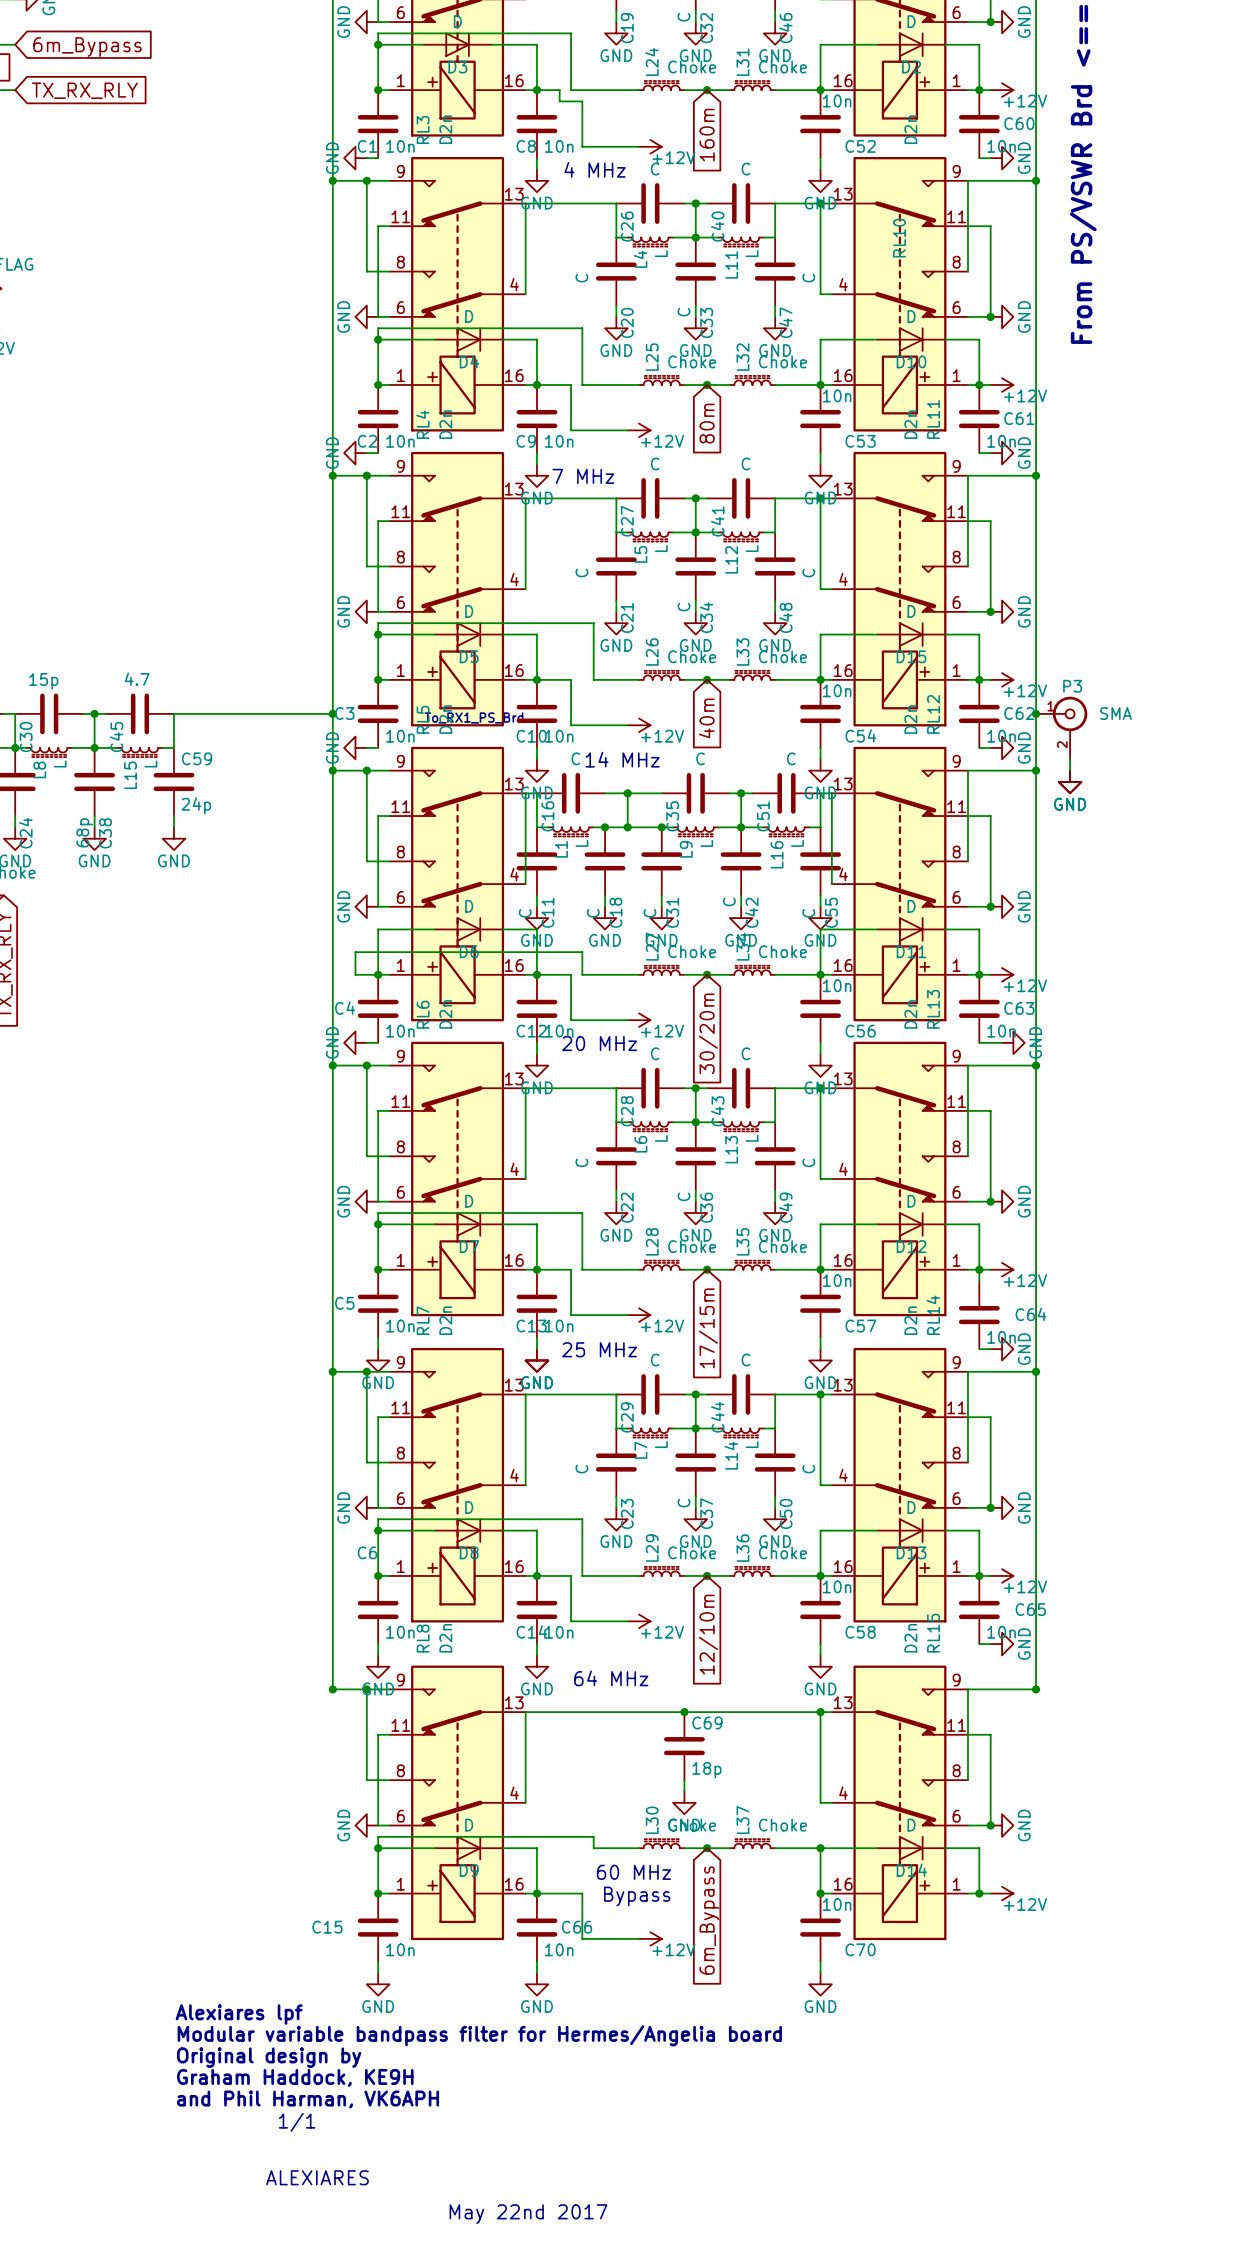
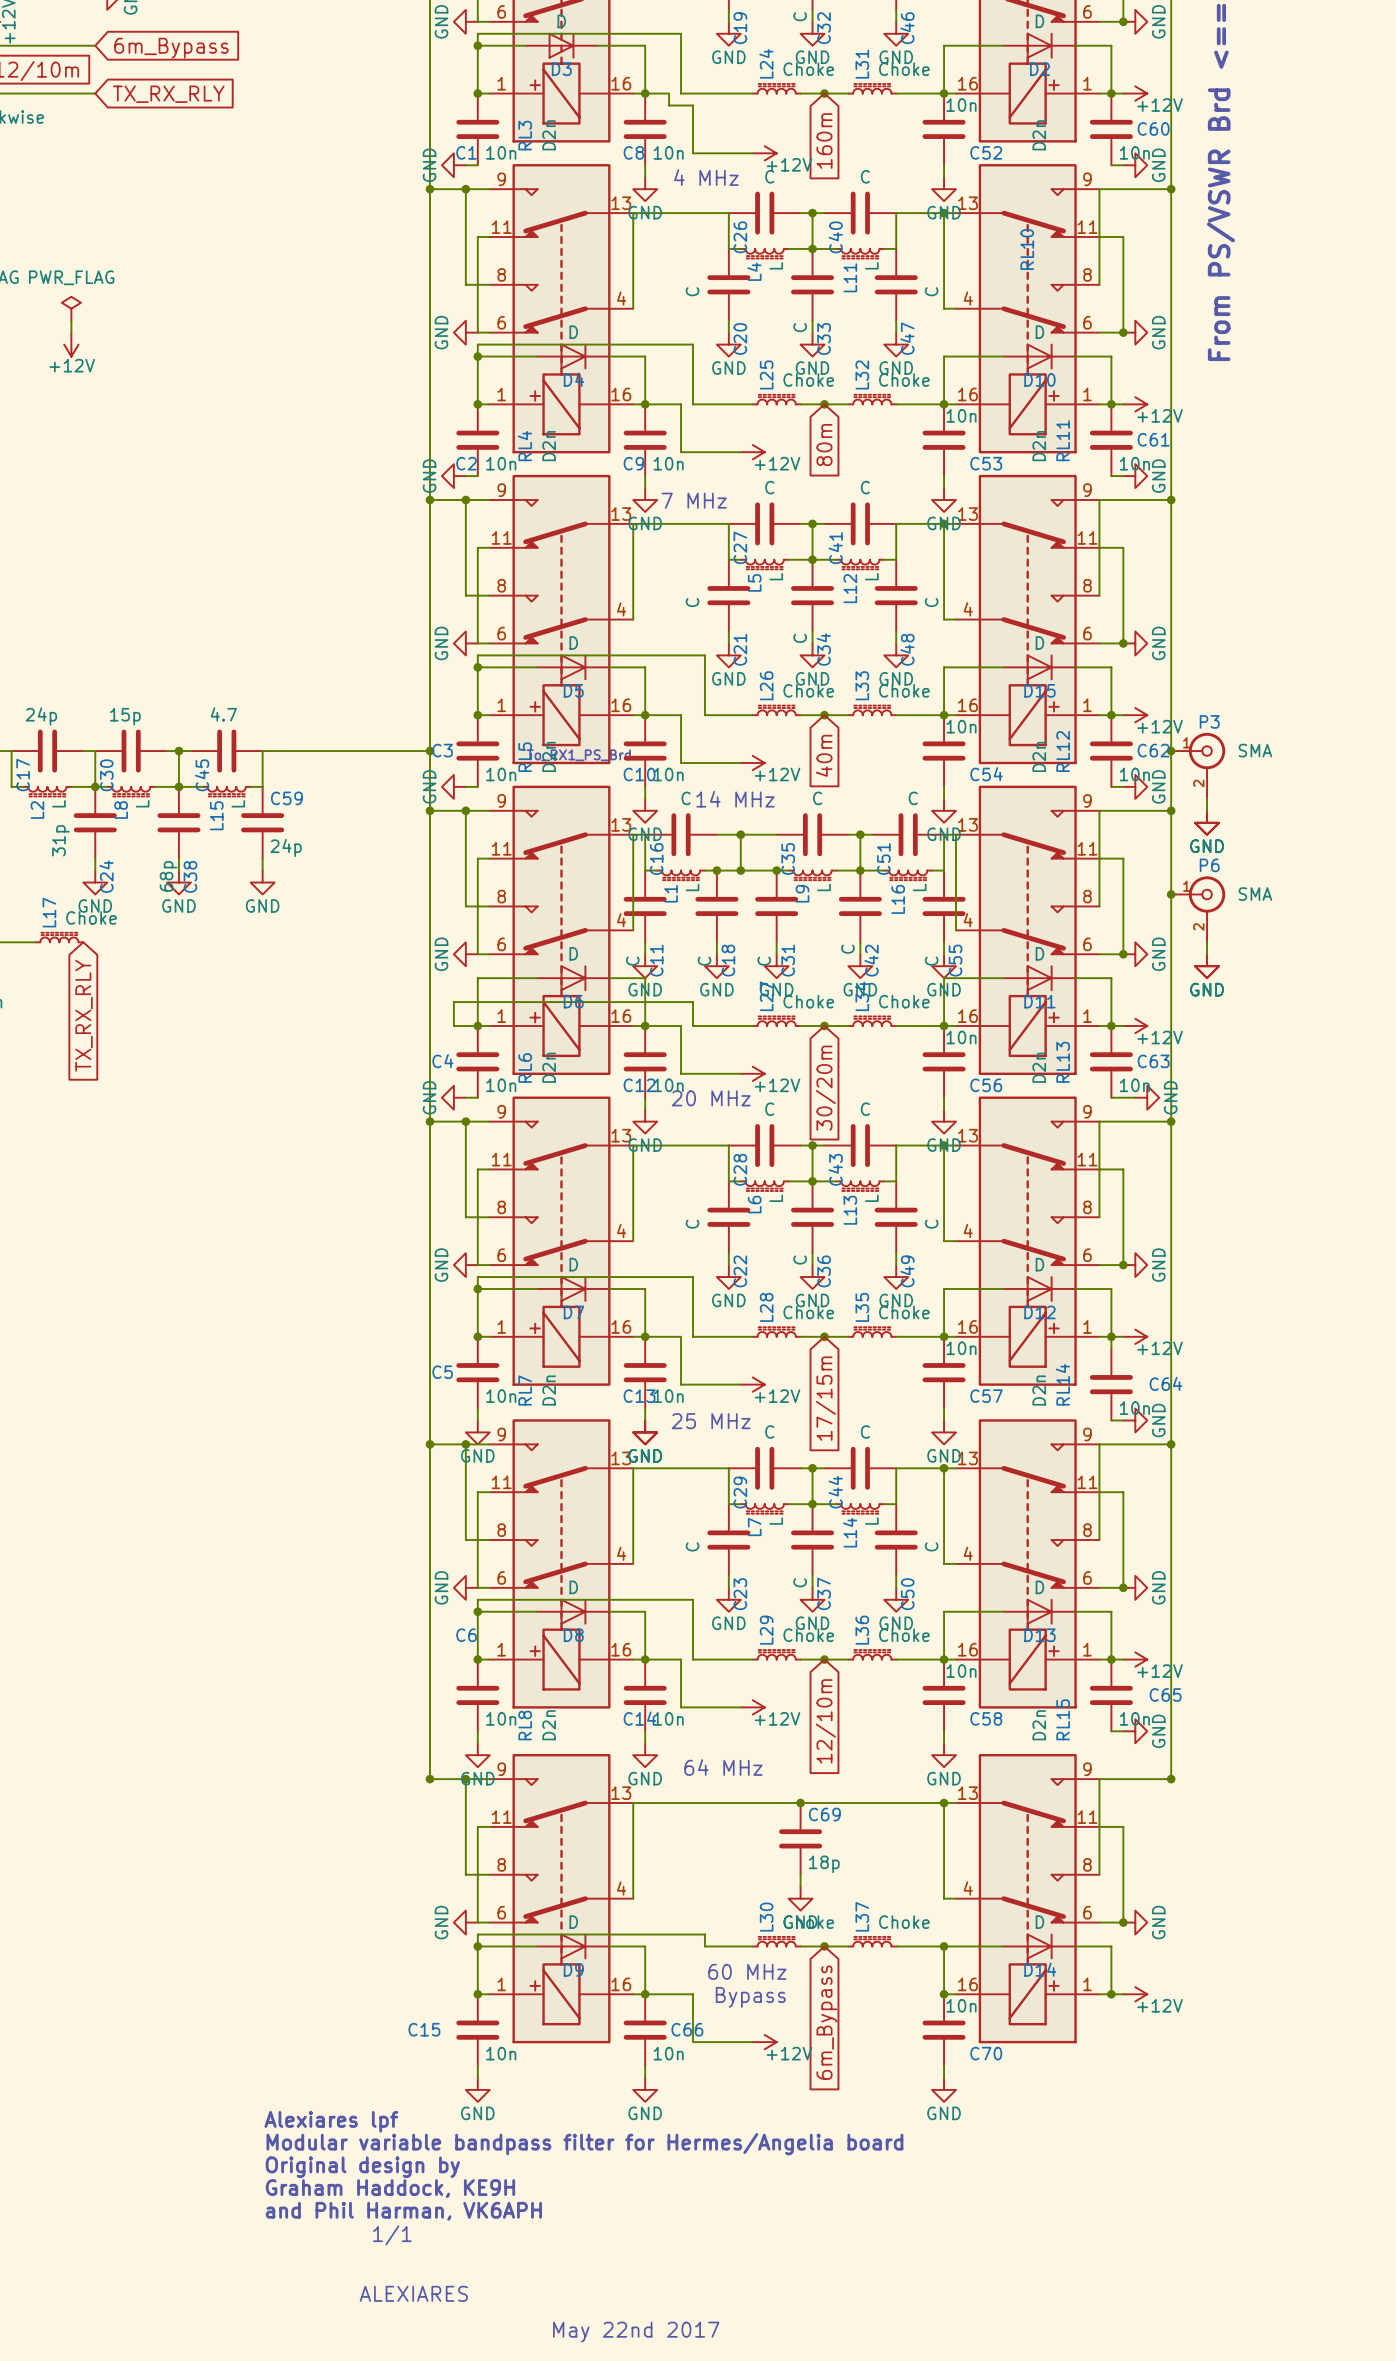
junction: none -> (1171, 894)
P6: none -> SMA (1198, 909)
wire: none -> (1207, 942) (1207, 954)
power symbol: none -> GND (1207, 966)

